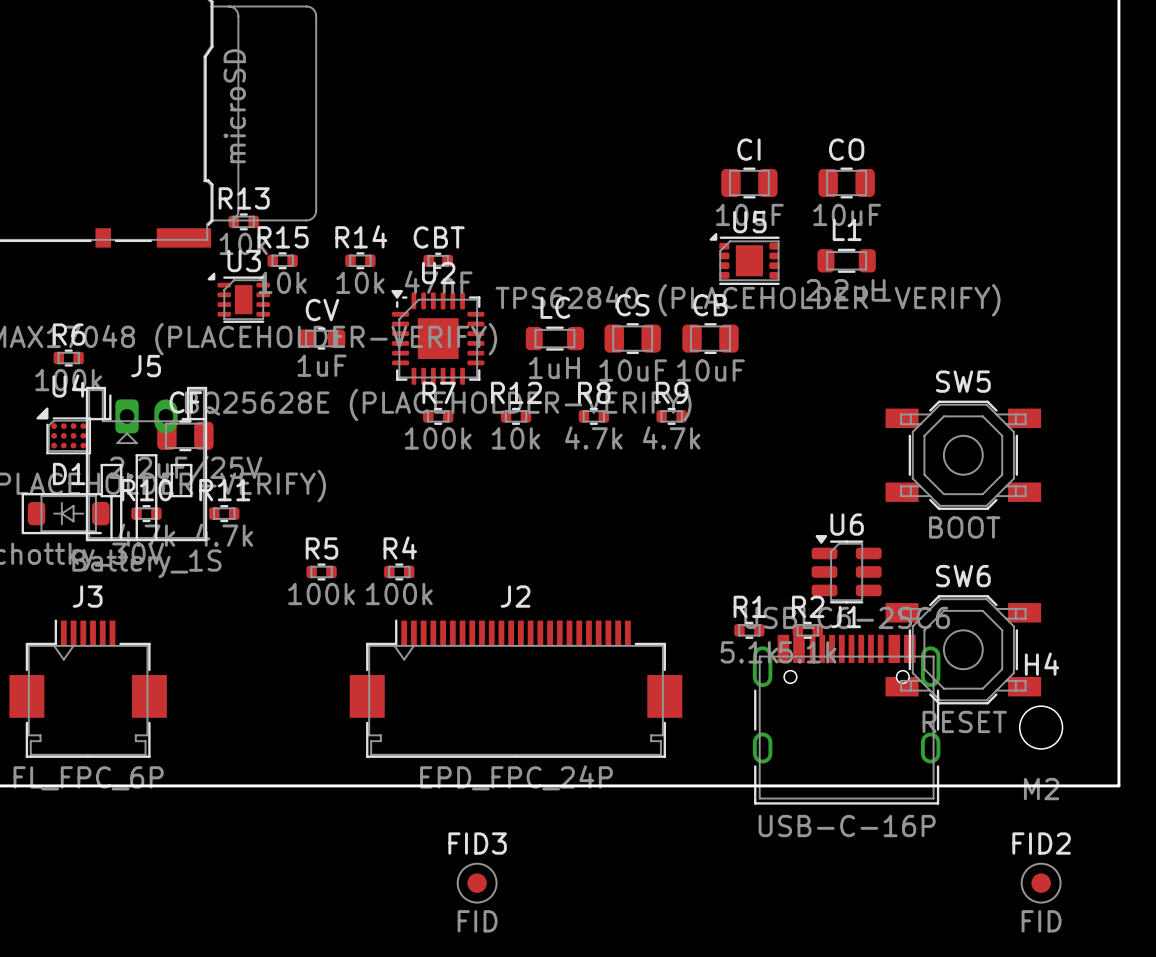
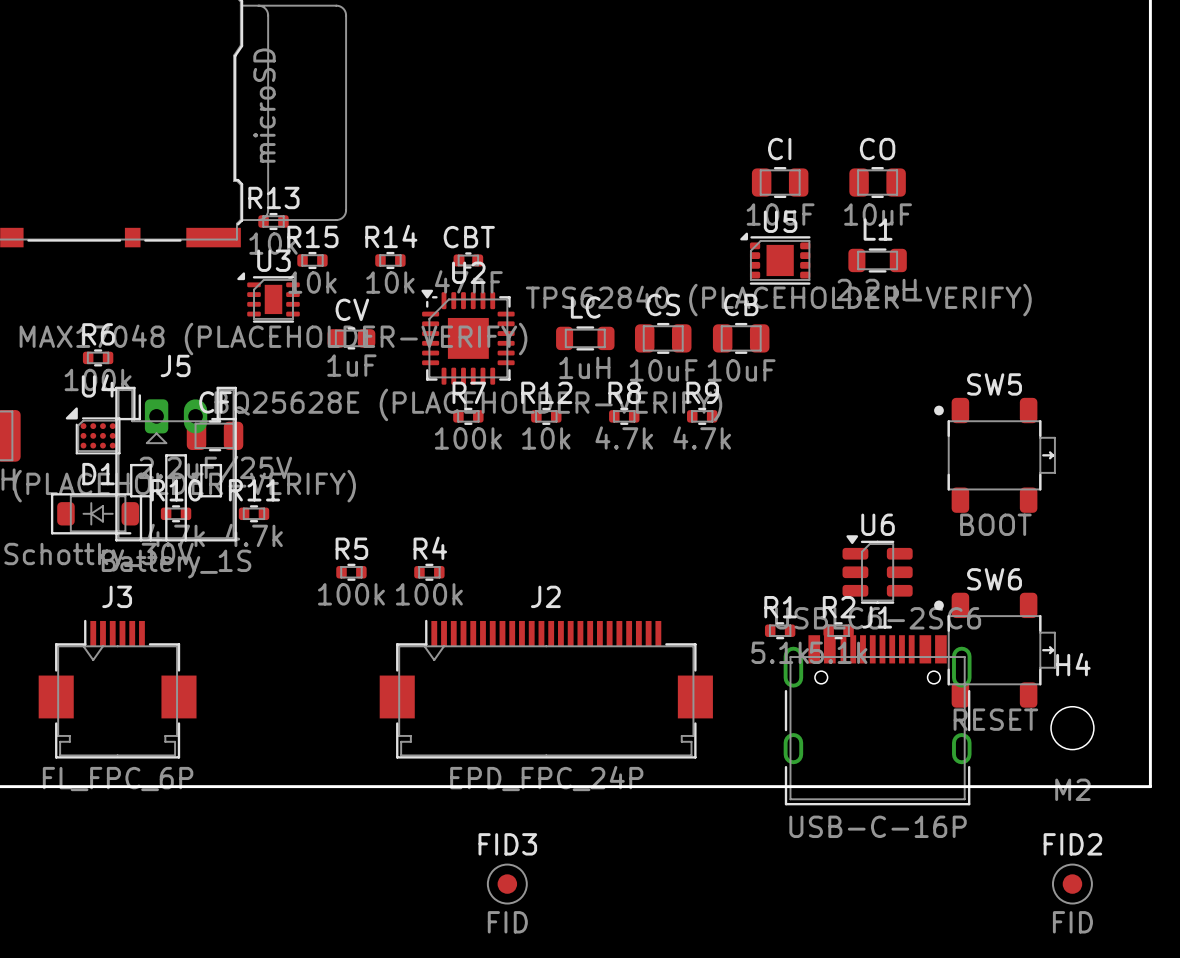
SW5 footprint: [885, 400, 1042, 510] -> [934, 397, 1056, 513]
SW6 footprint: [885, 595, 1042, 705] -> [934, 592, 1056, 708]

